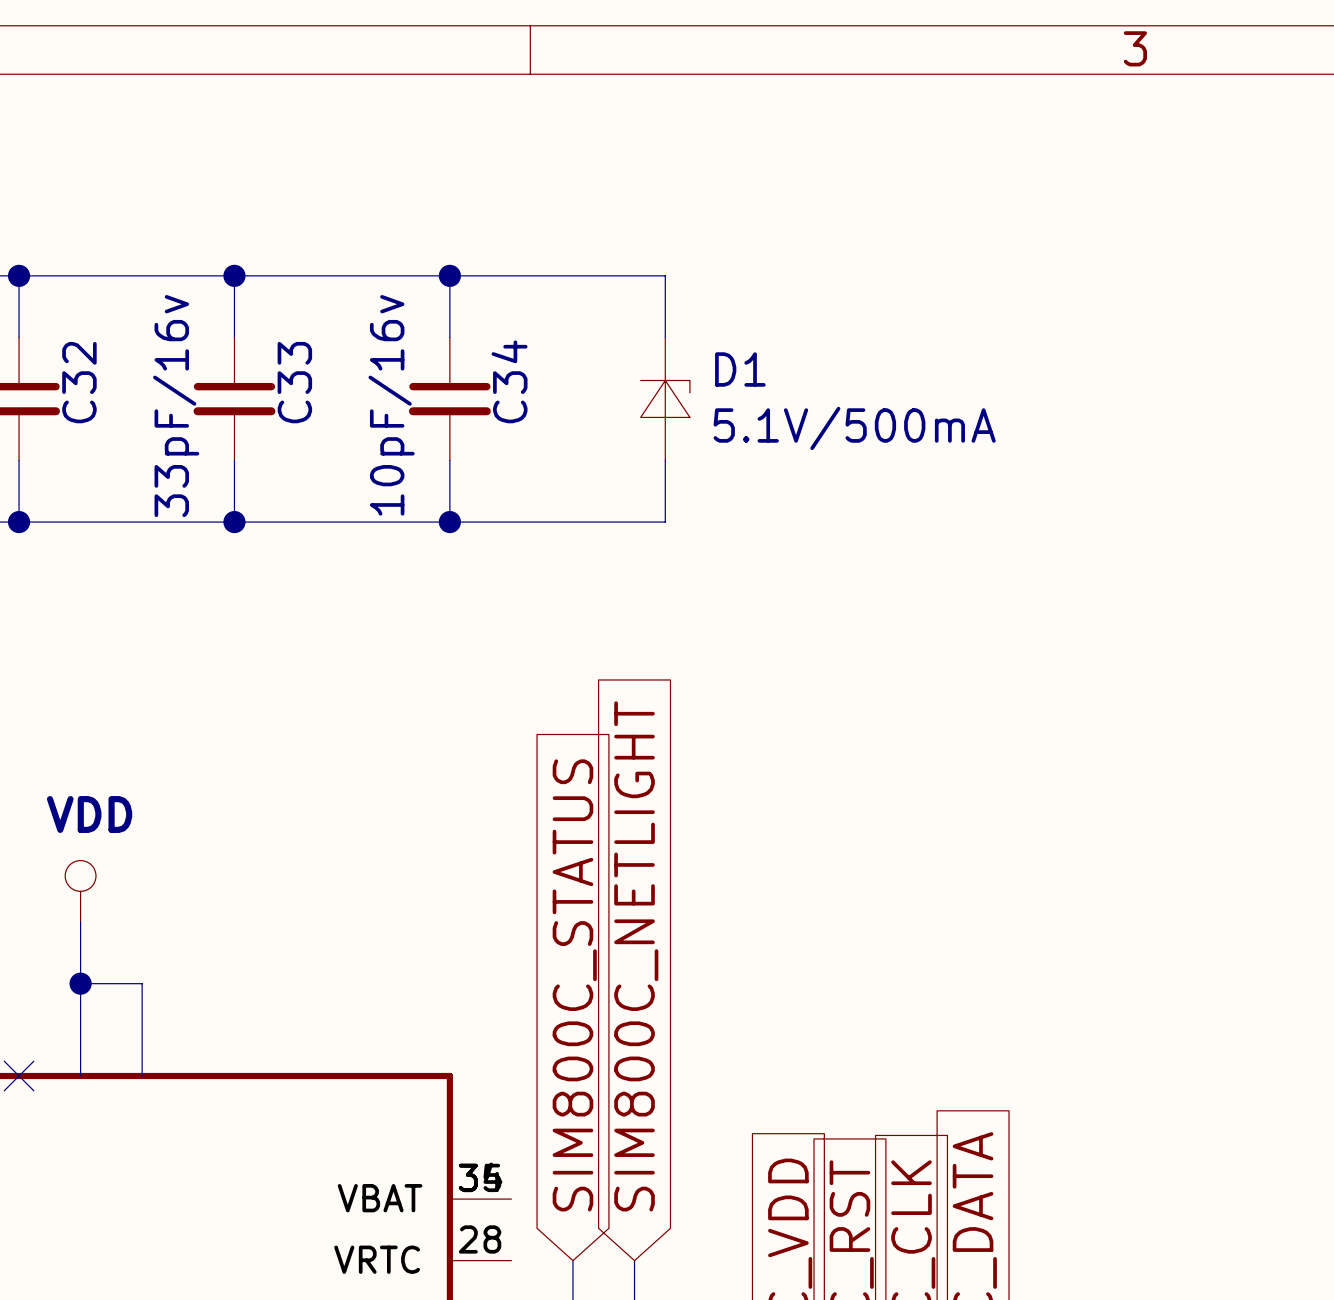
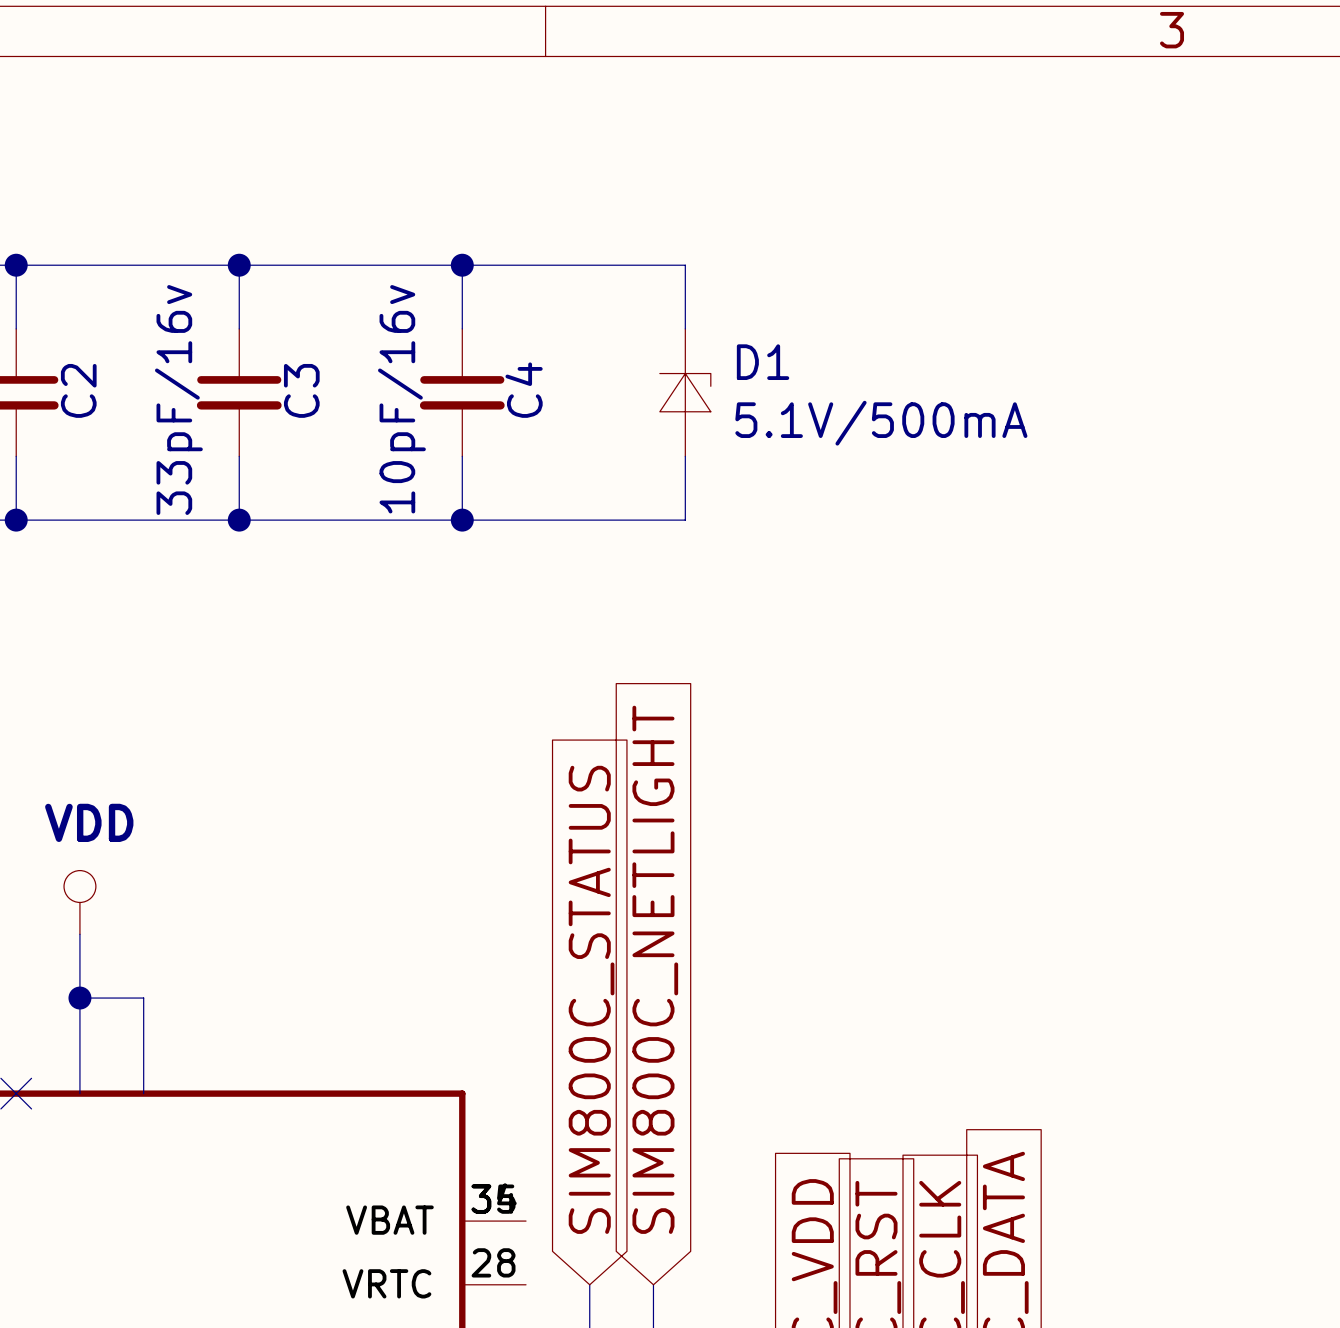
C34 name: C34 (509, 381) -> C4 (524, 390)
C32 name: C32 (79, 382) -> C2 (78, 390)
C33 name: C33 (294, 382) -> C3 (301, 390)

